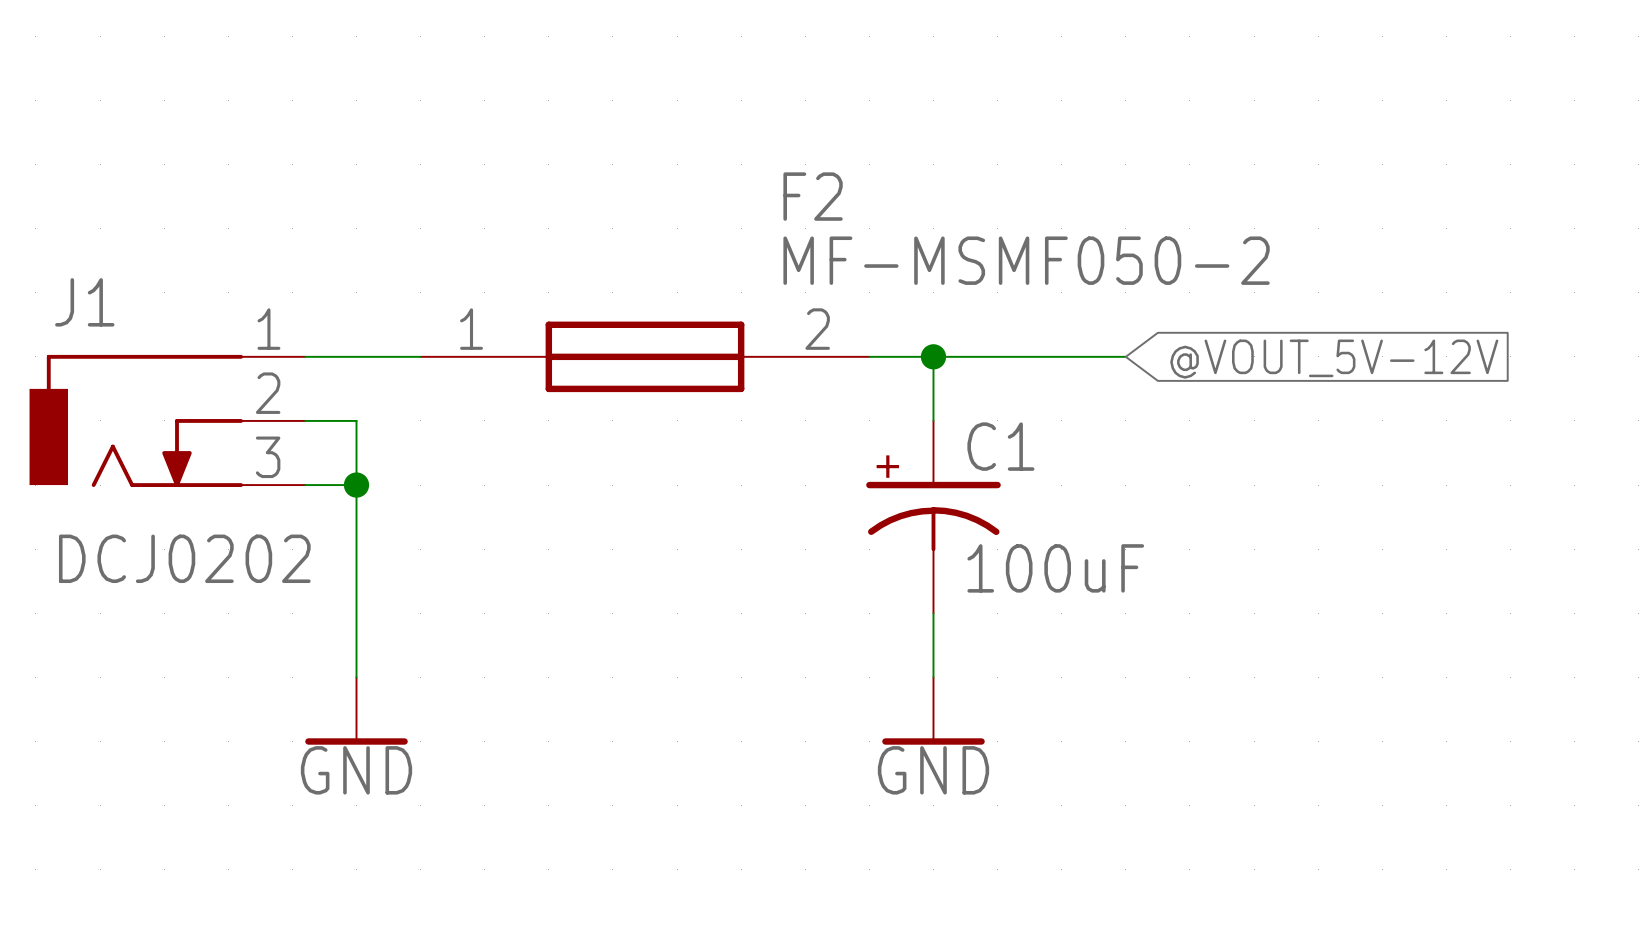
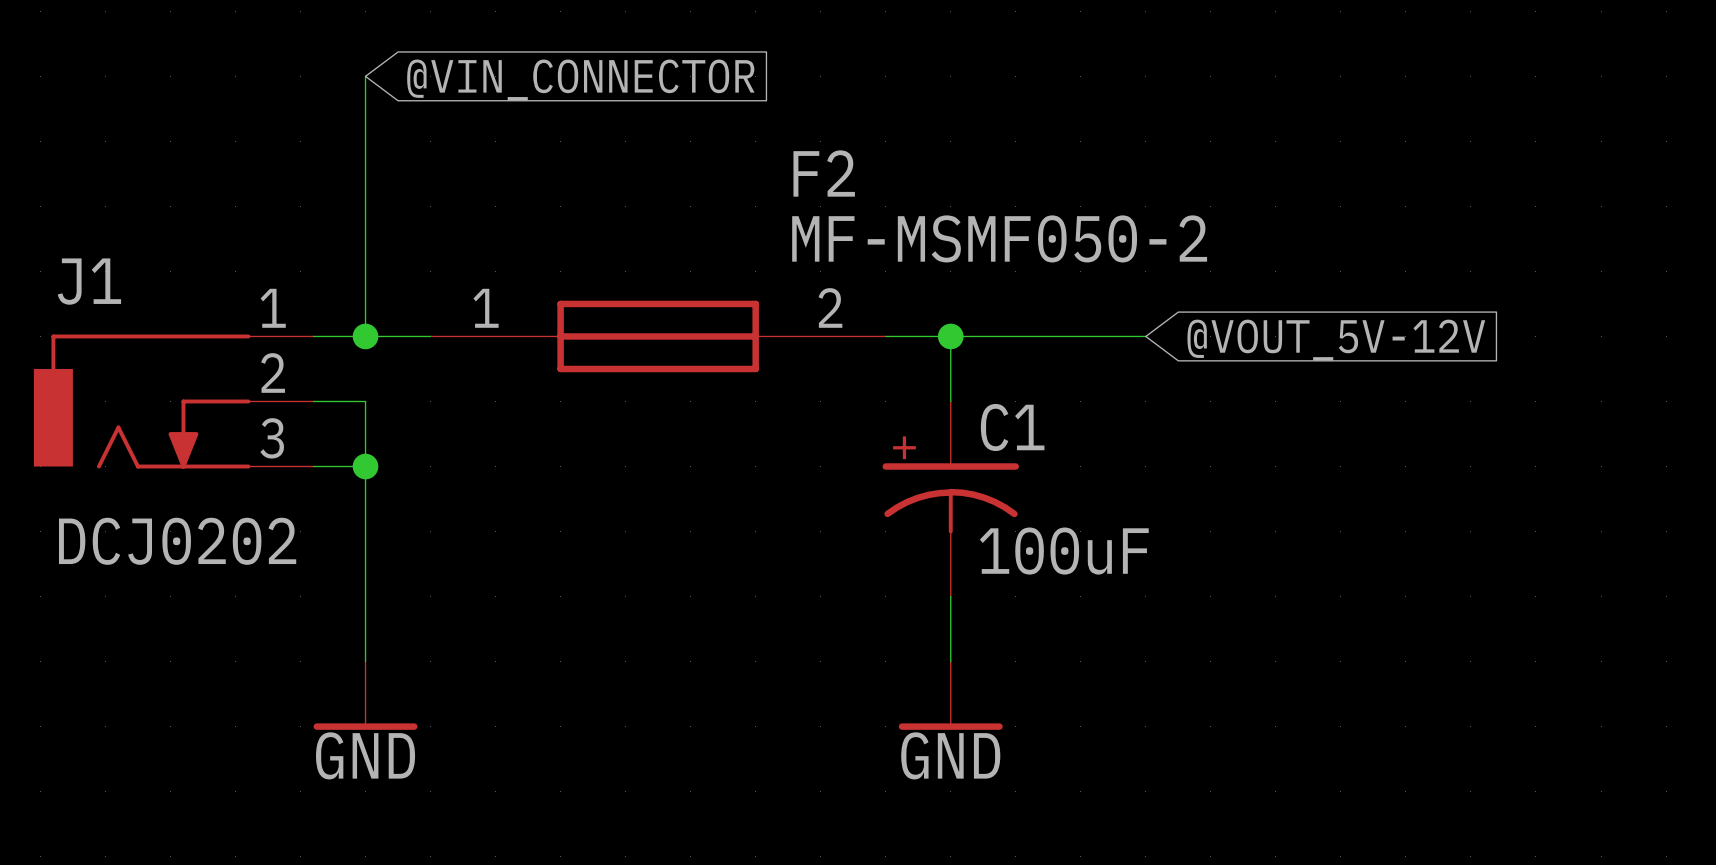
wire: none -> (365, 76) (365, 336)
global label: none -> @VIN_CONNECTOR (580, 80)
junction: none -> (365, 336)

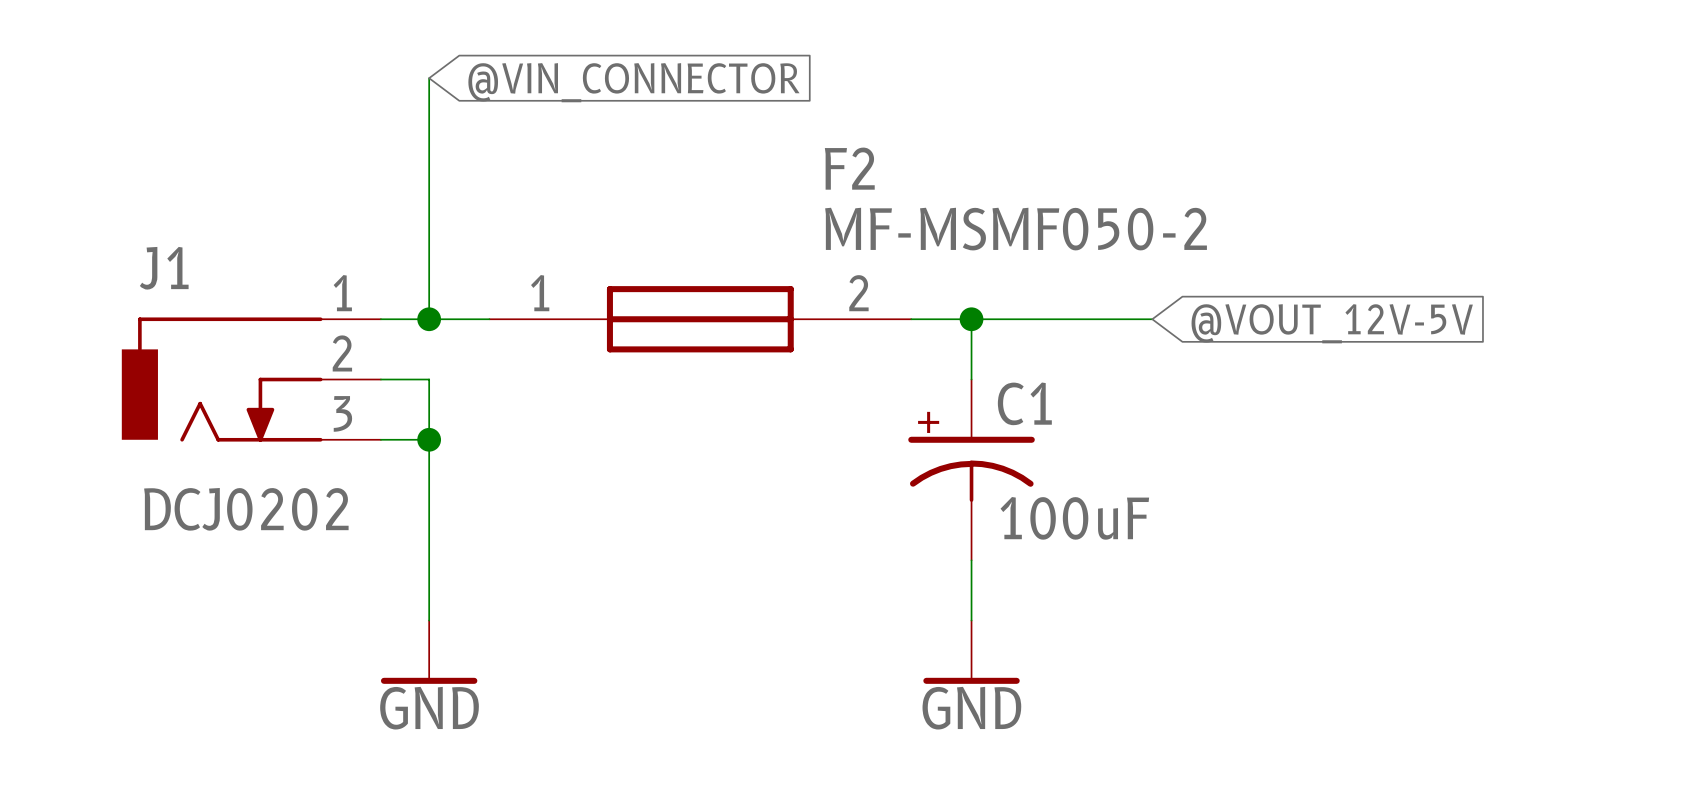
global label: @VOUT_5V-12V (1336, 340) -> @VOUT_12V-5V (1332, 323)

